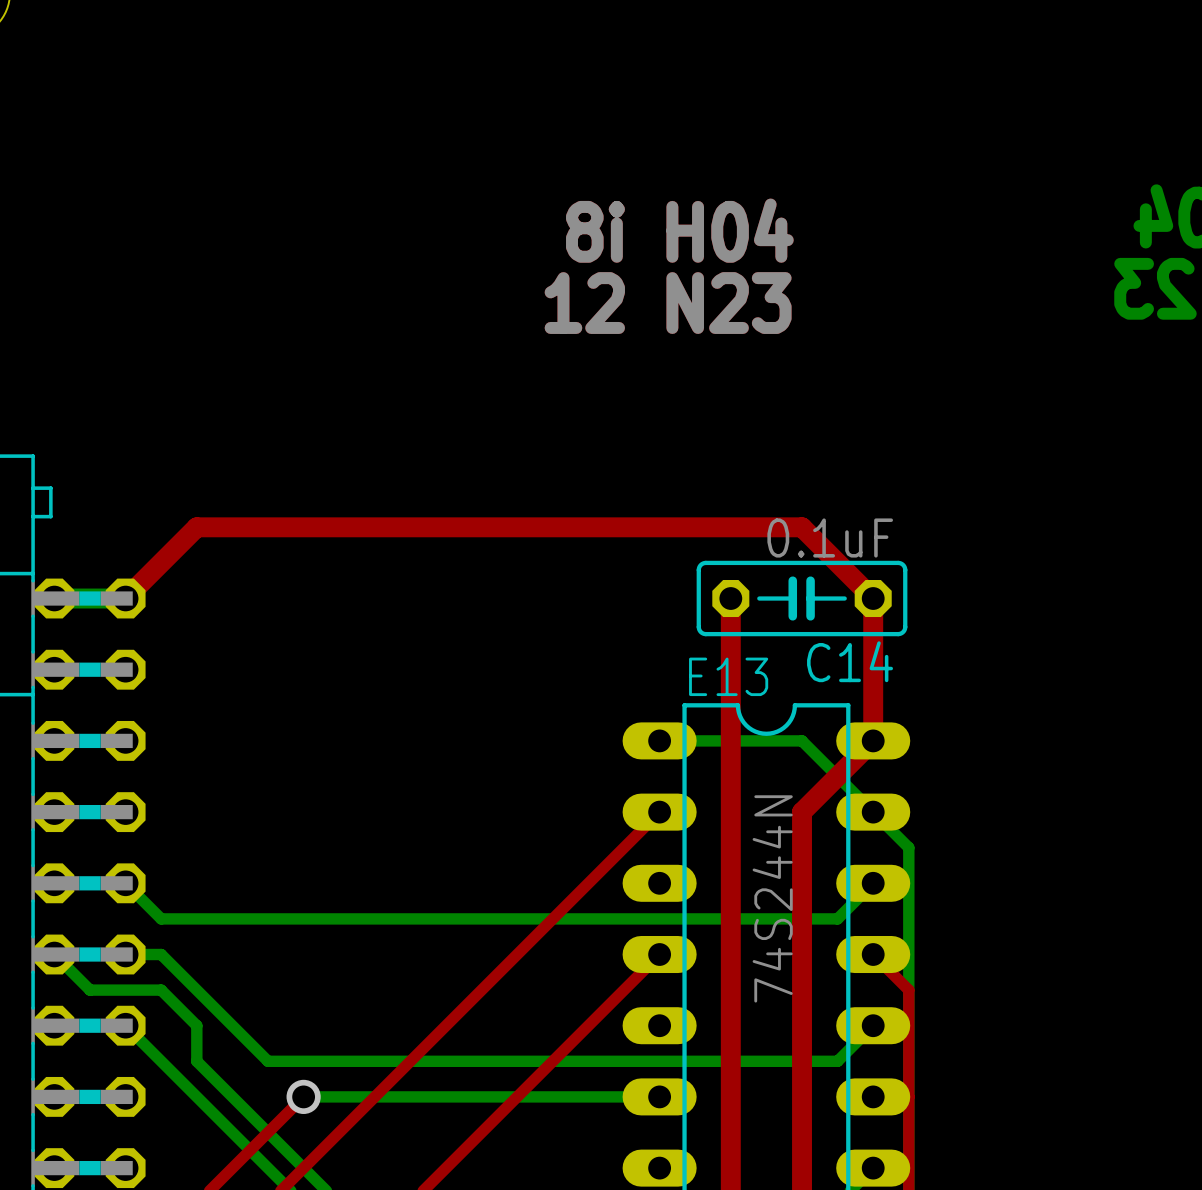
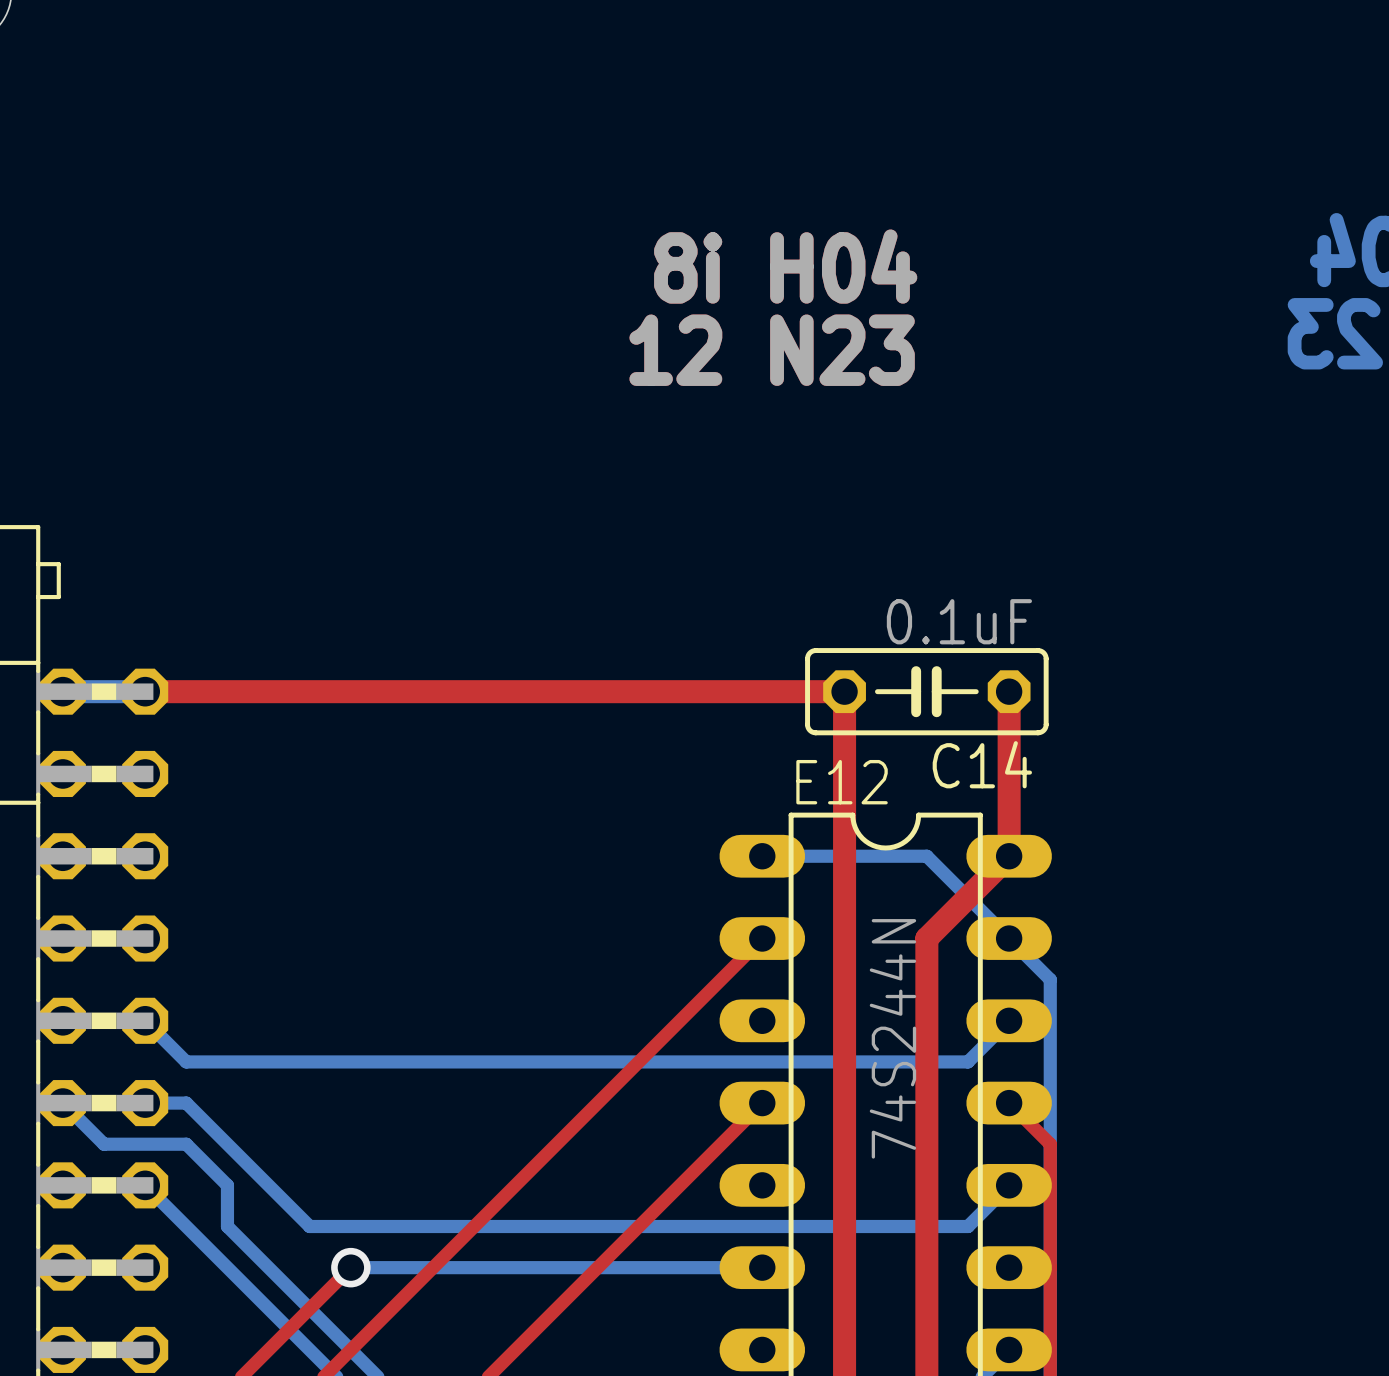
top track: (125, 598) (196, 527) (802, 527) (873, 598) -> (145, 691) (844, 691)
E13 name: E13 (728, 676) -> E12 (842, 782)

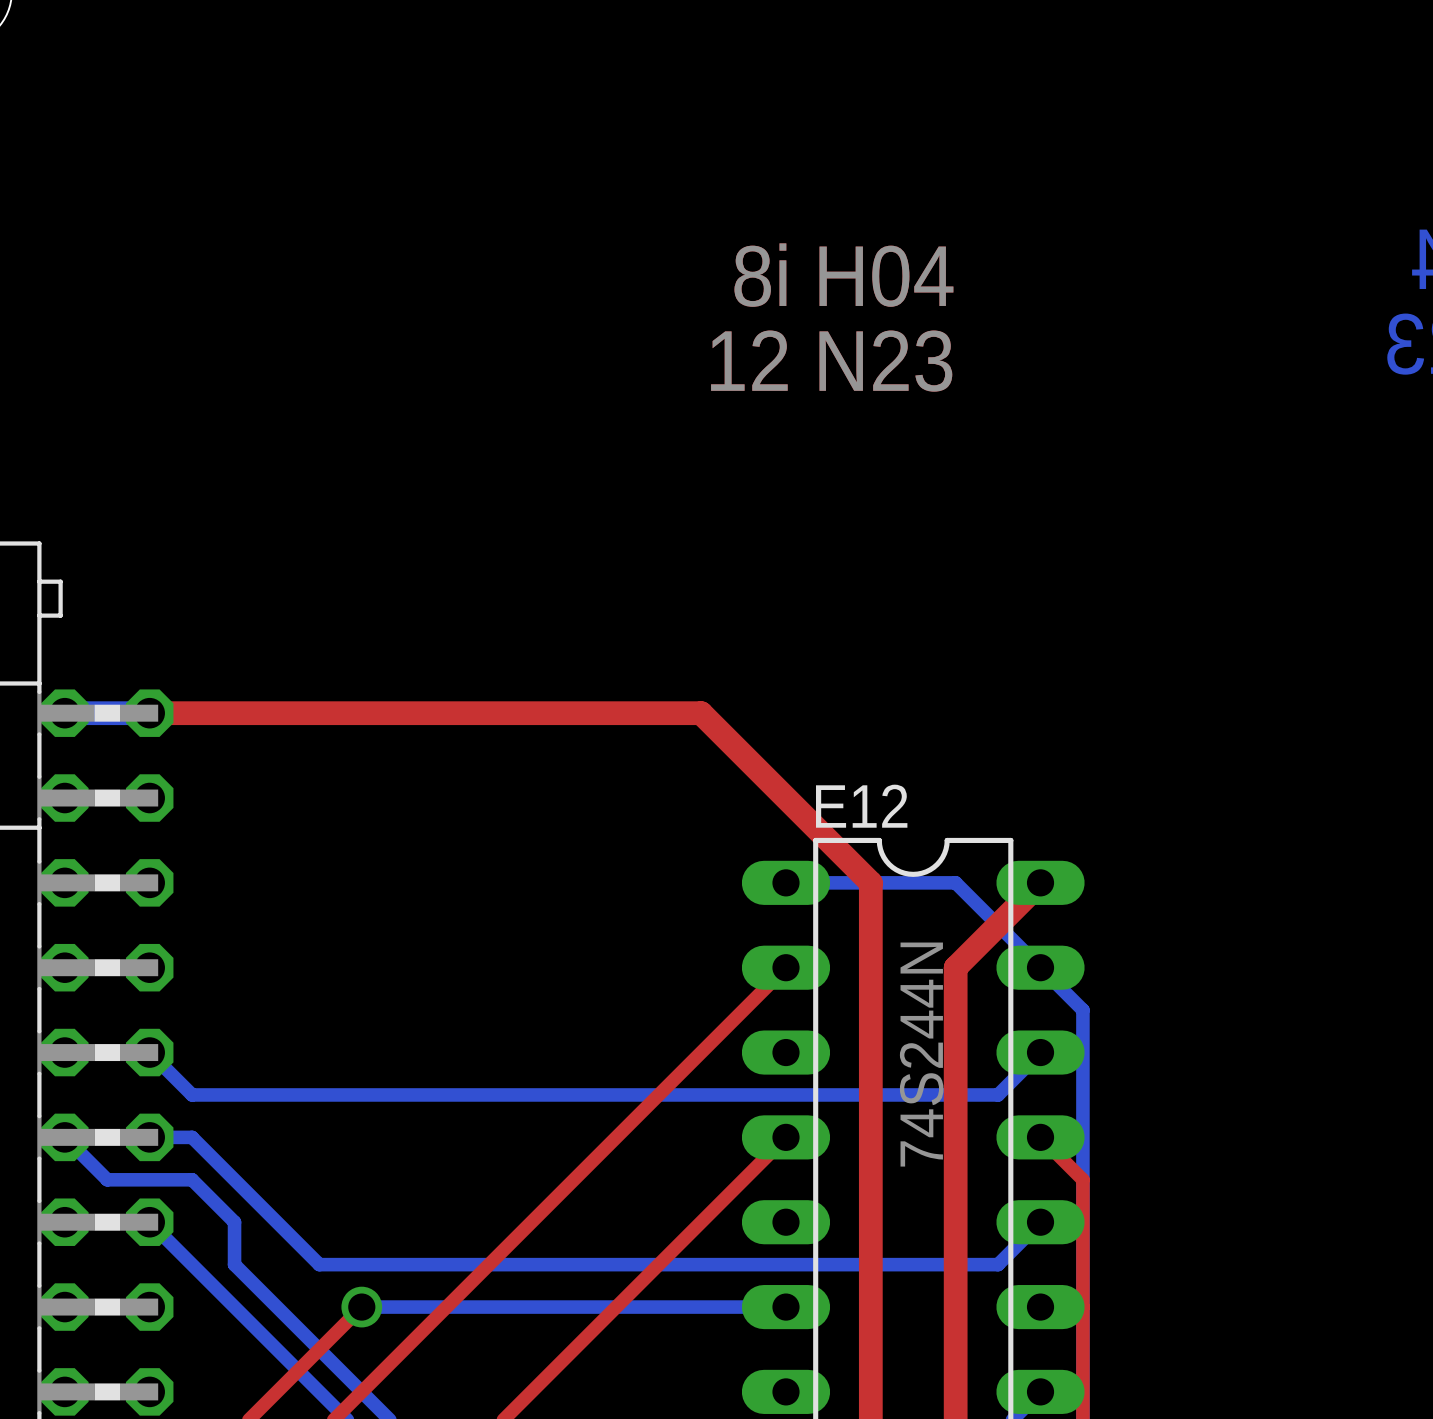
top track: (680, 691) (844, 691) (844, 856) -> (701, 713) (870, 882)
C14: 0.1uF (926, 691) -> none
top track: (1009, 691) (1009, 856) -> none

